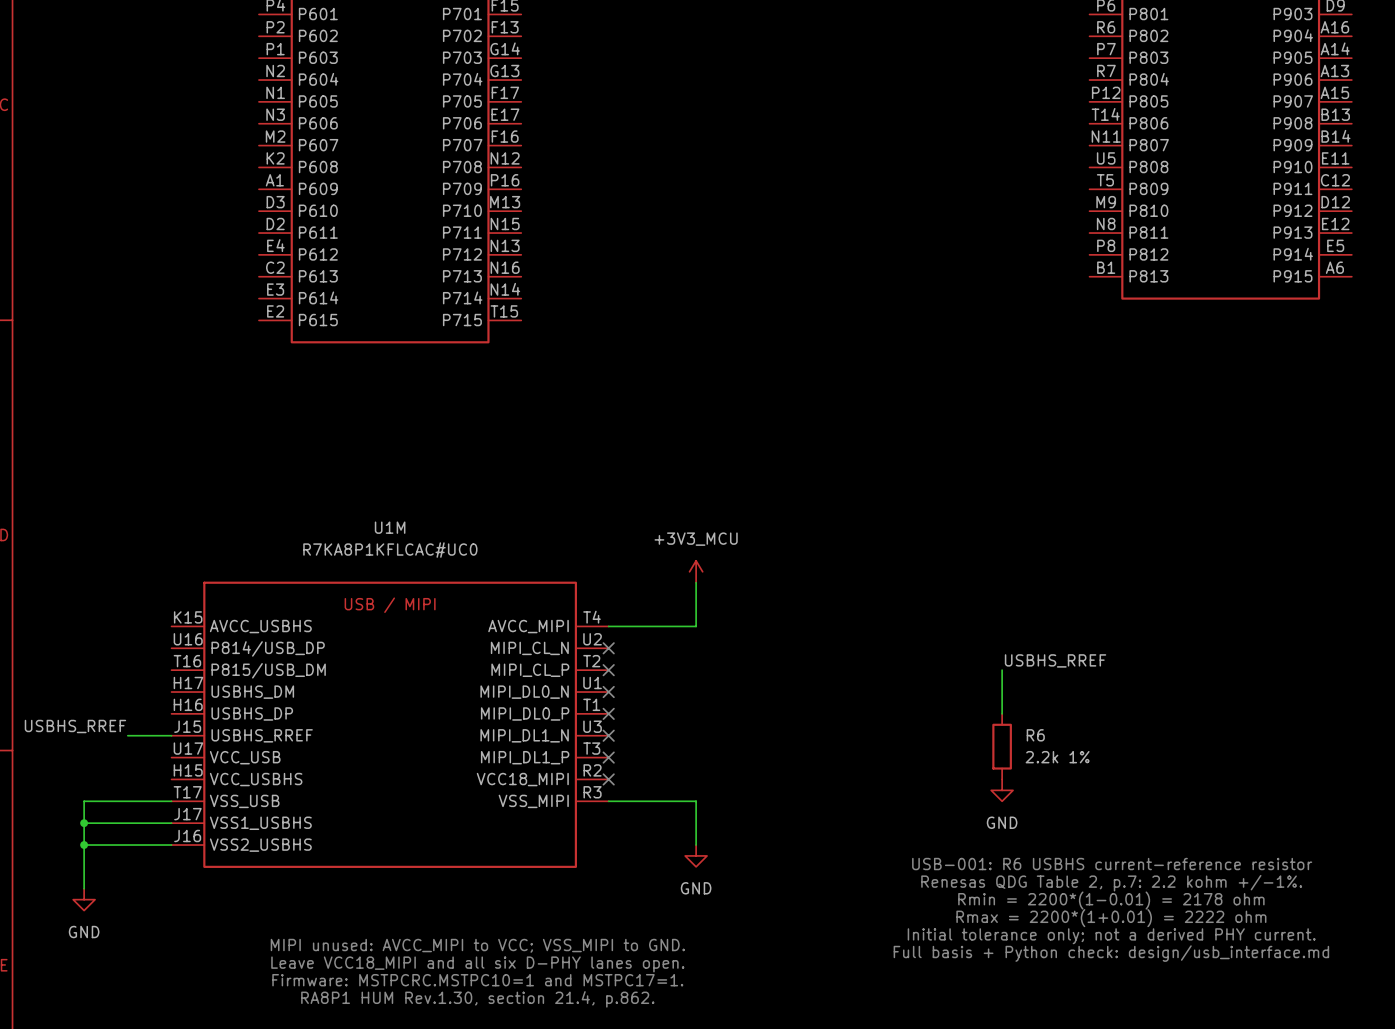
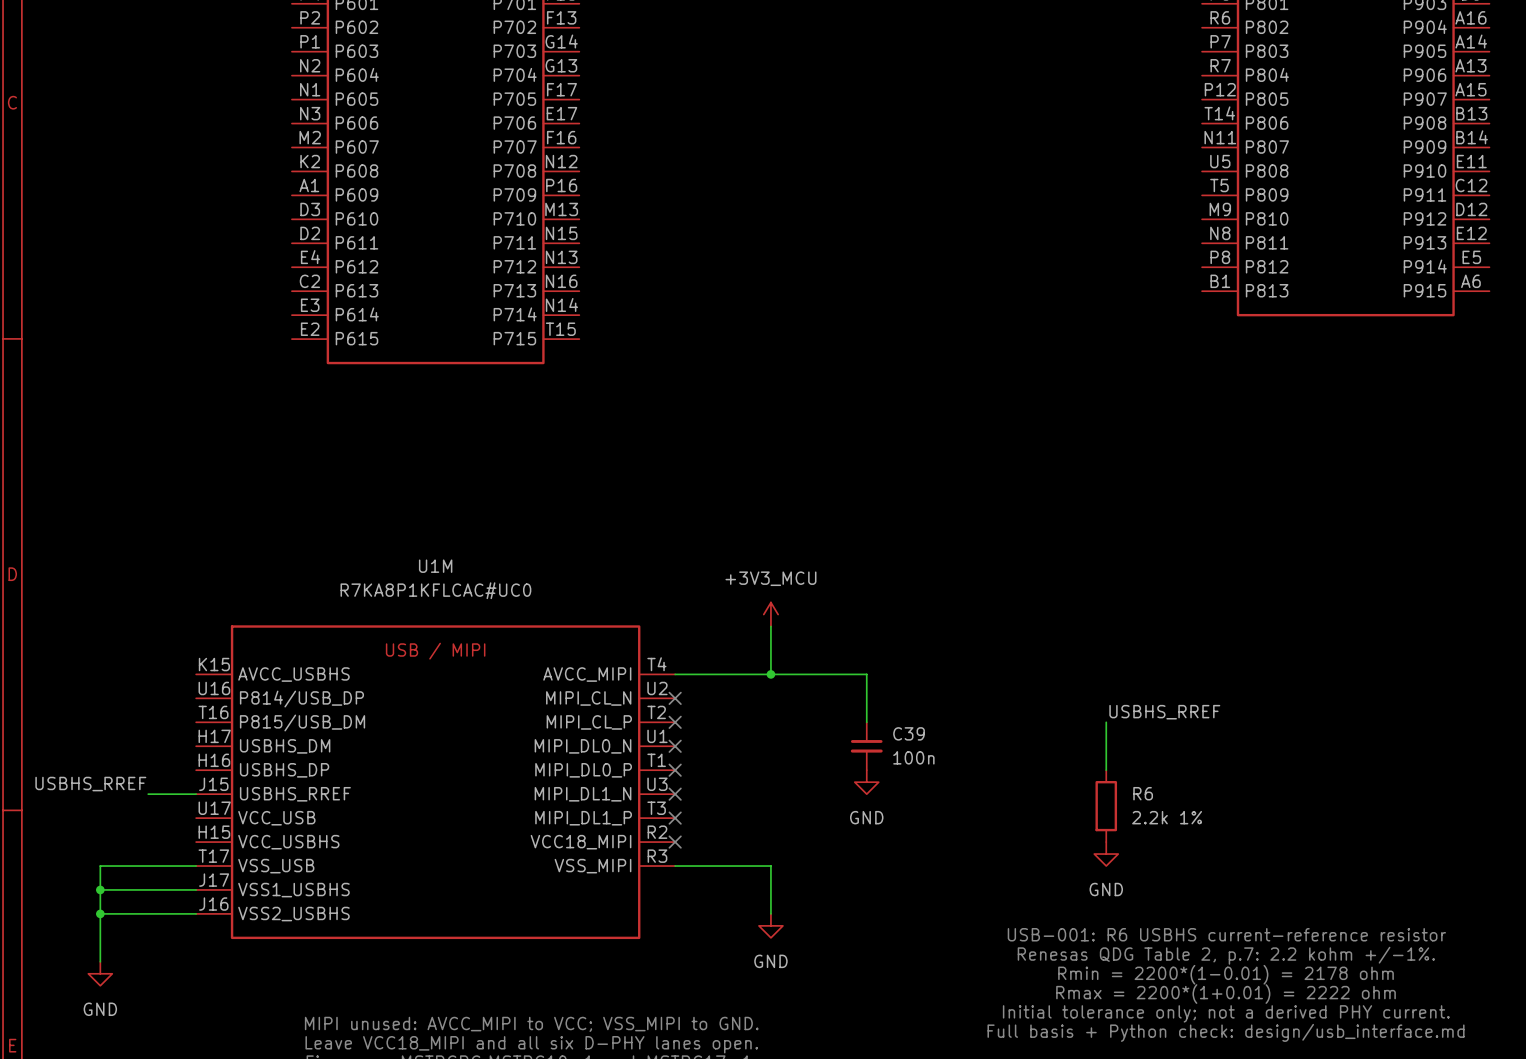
wire: none -> (770, 674) (866, 674) (866, 722)
junction: none -> (770, 674)
C39: none -> 100n (866, 746)
power symbol: none -> GND (866, 782)

